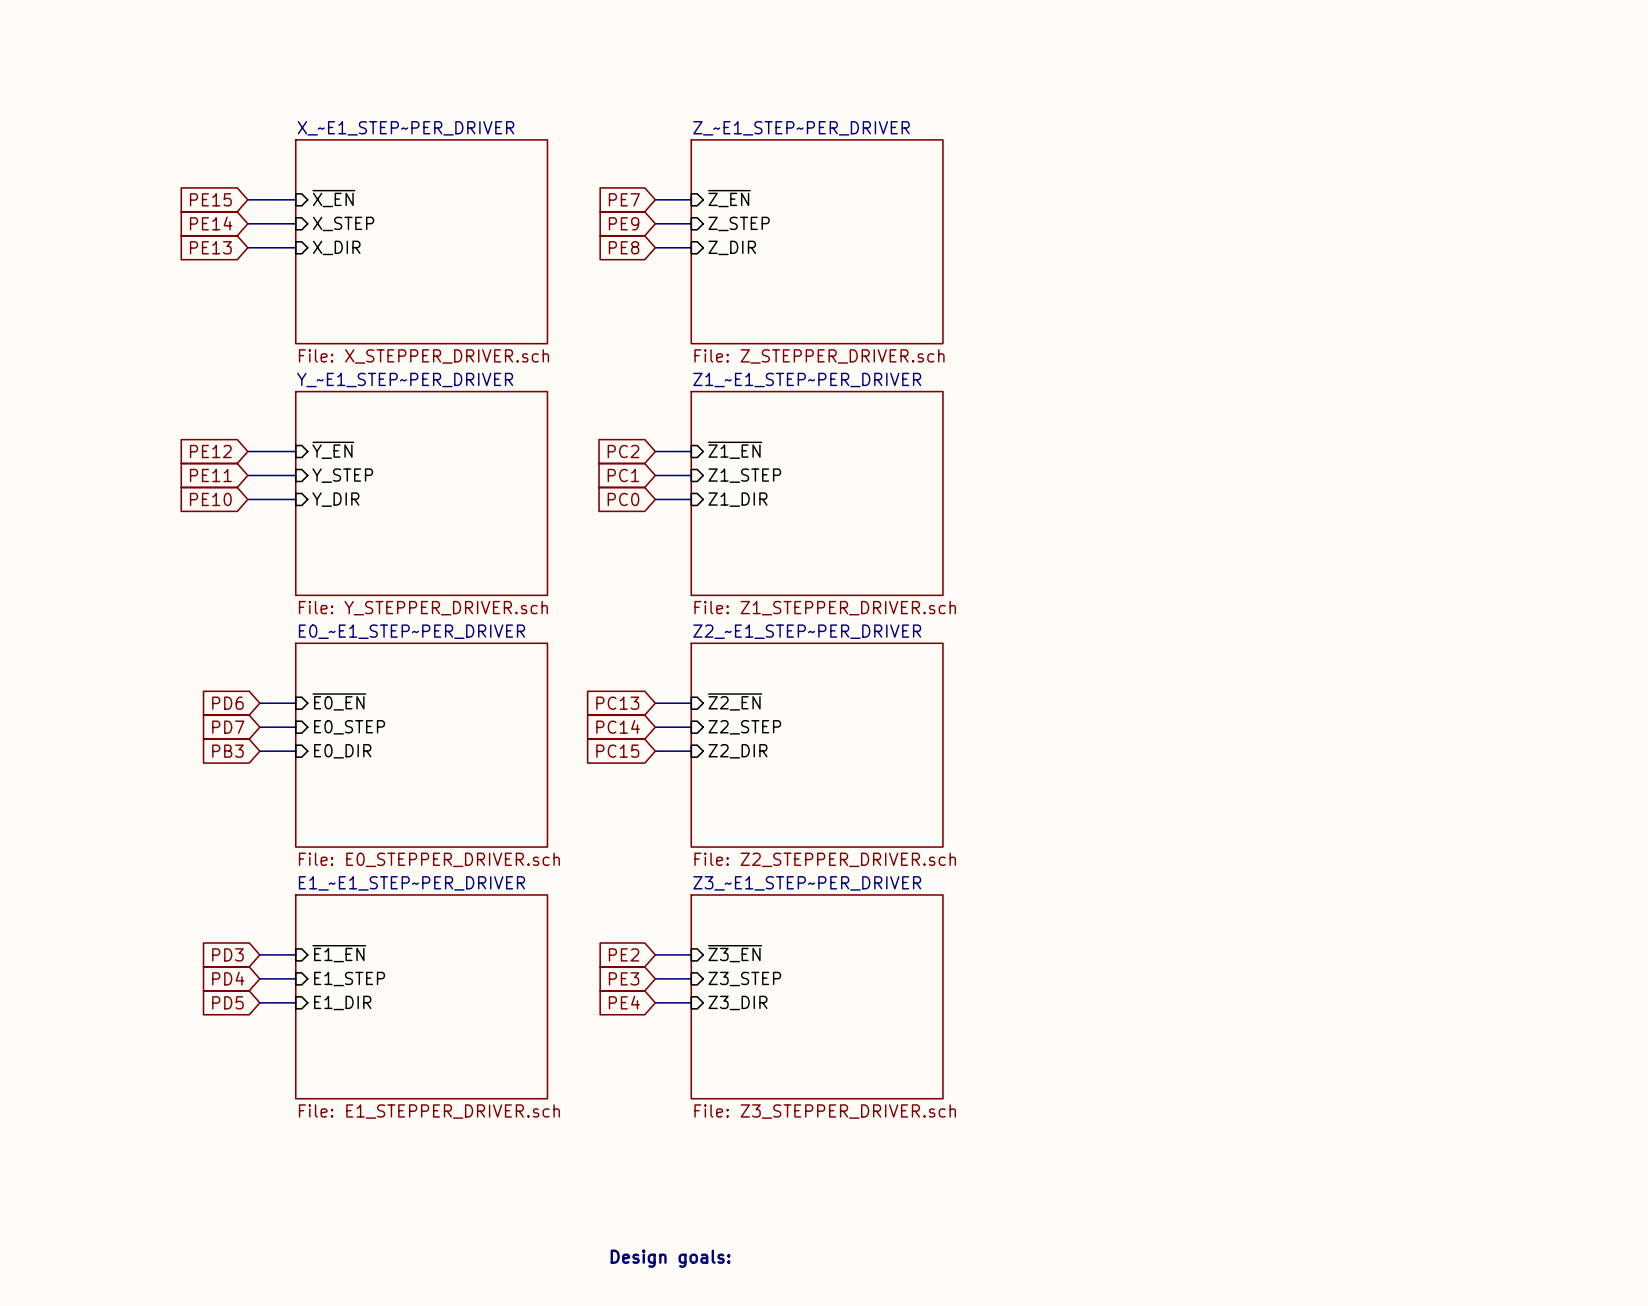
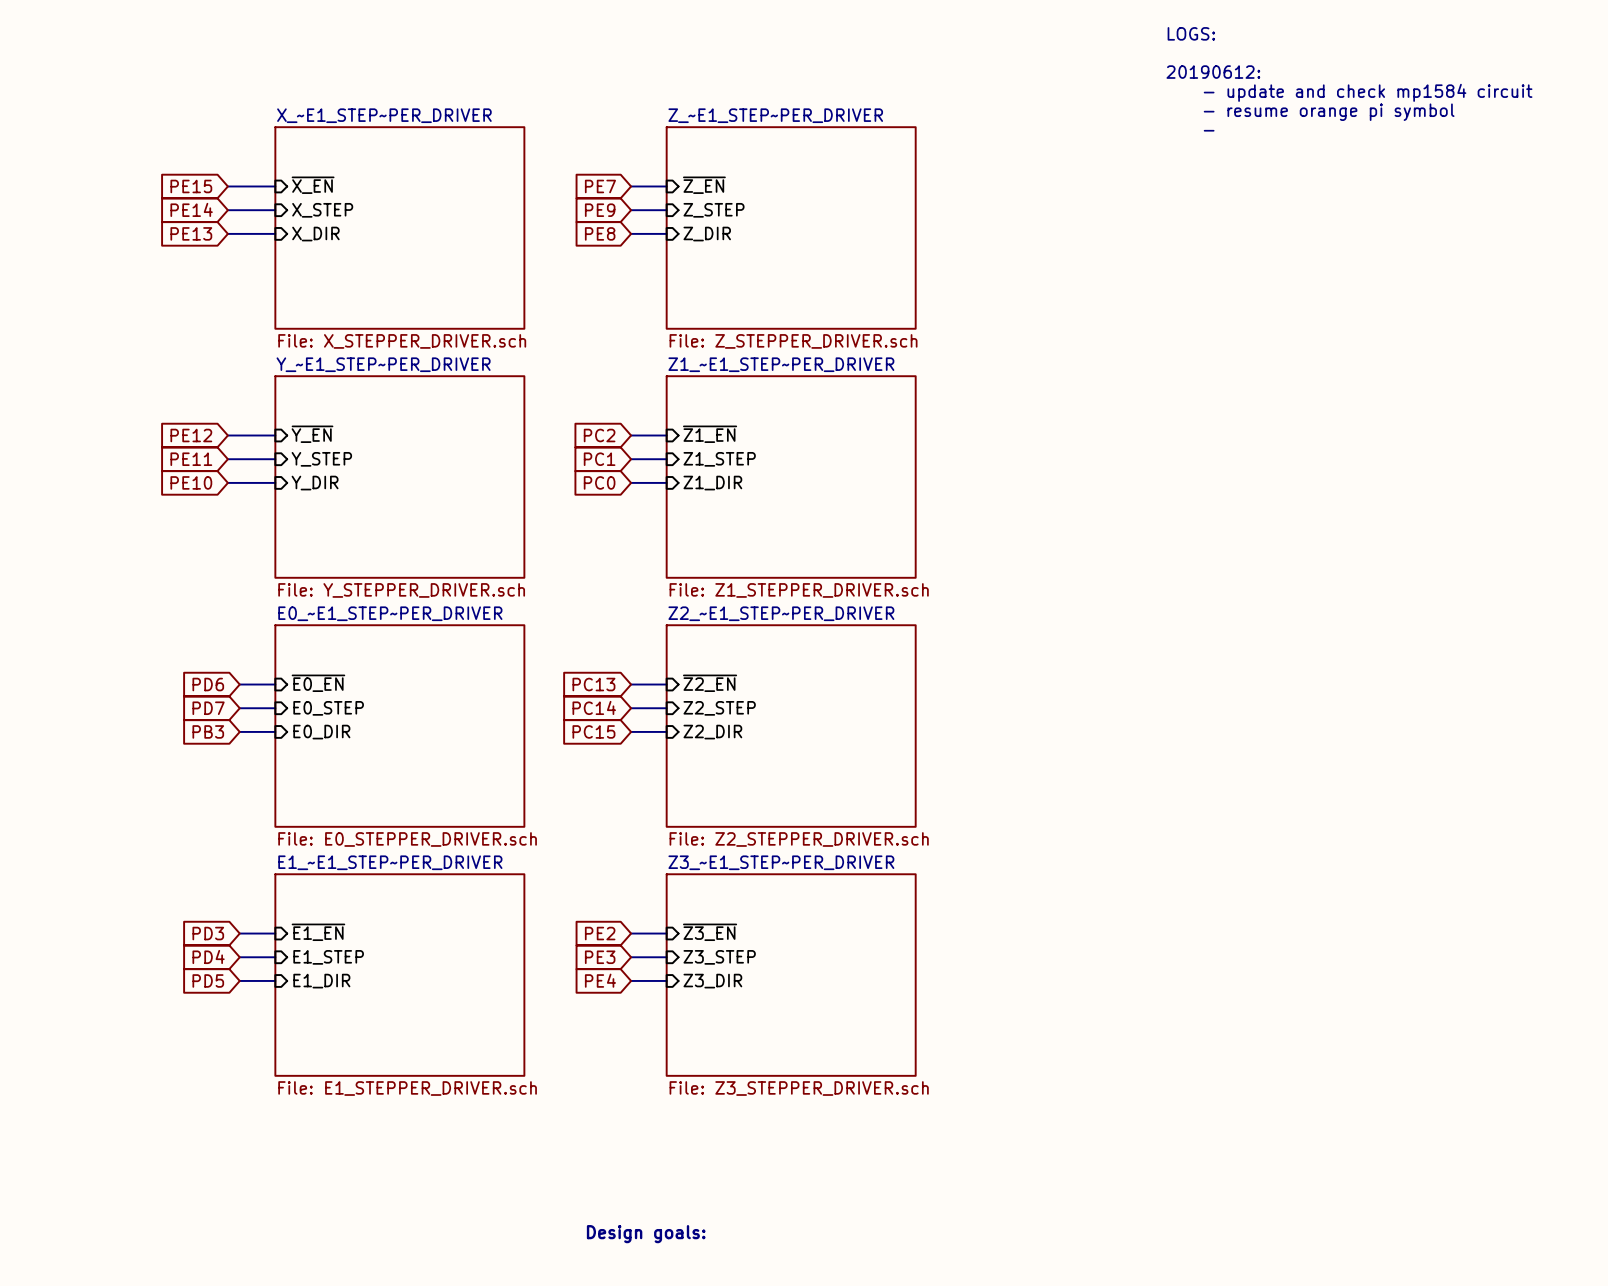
text: none -> LOGS: (1191, 33)
text: none -> 20190612: (1213, 72)
text: none -> - update and check mp1584 circuit (1368, 92)
text: none -> - resume orange pi symbol (1329, 112)
text: none -> - (1209, 130)

